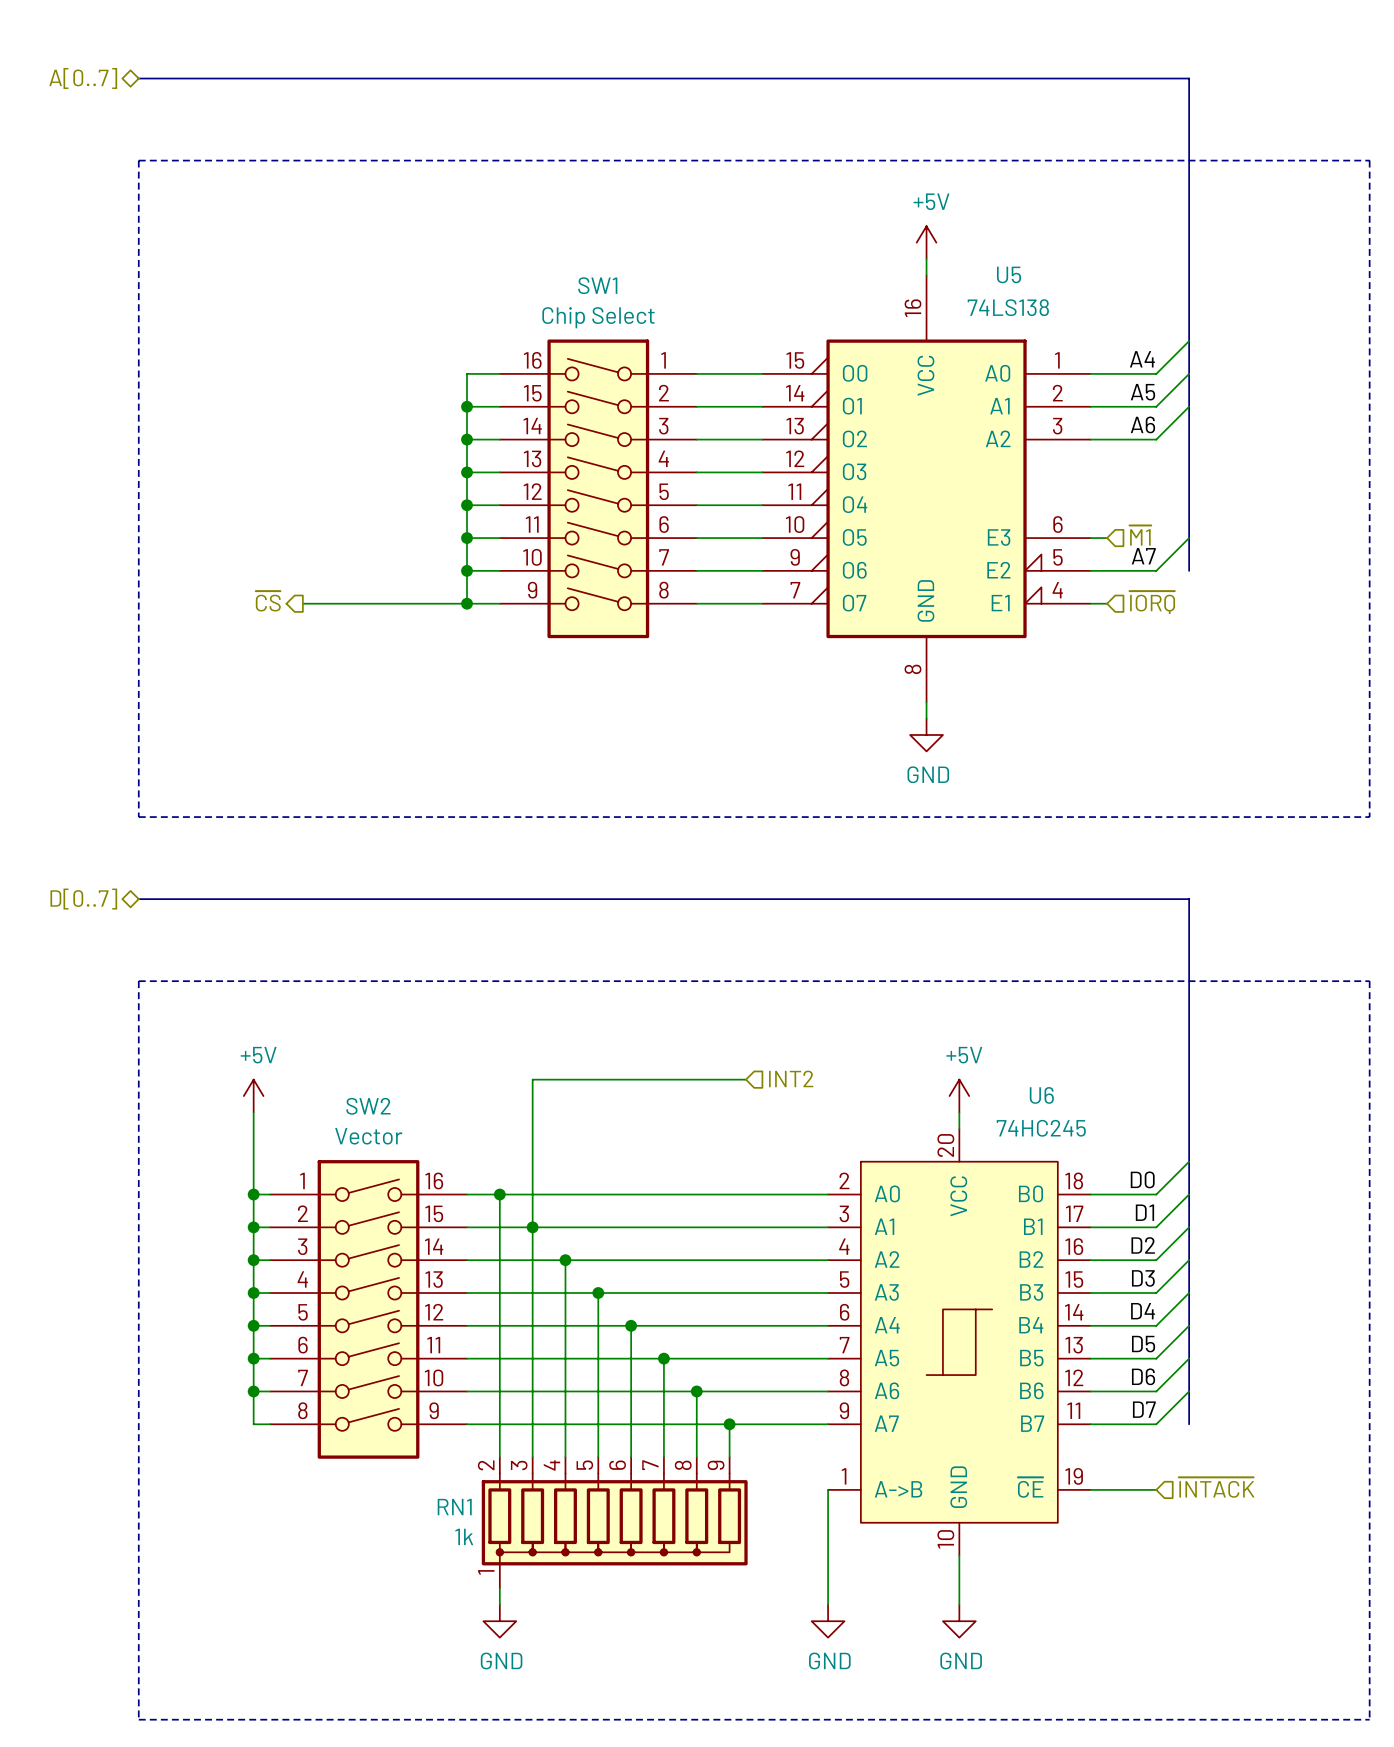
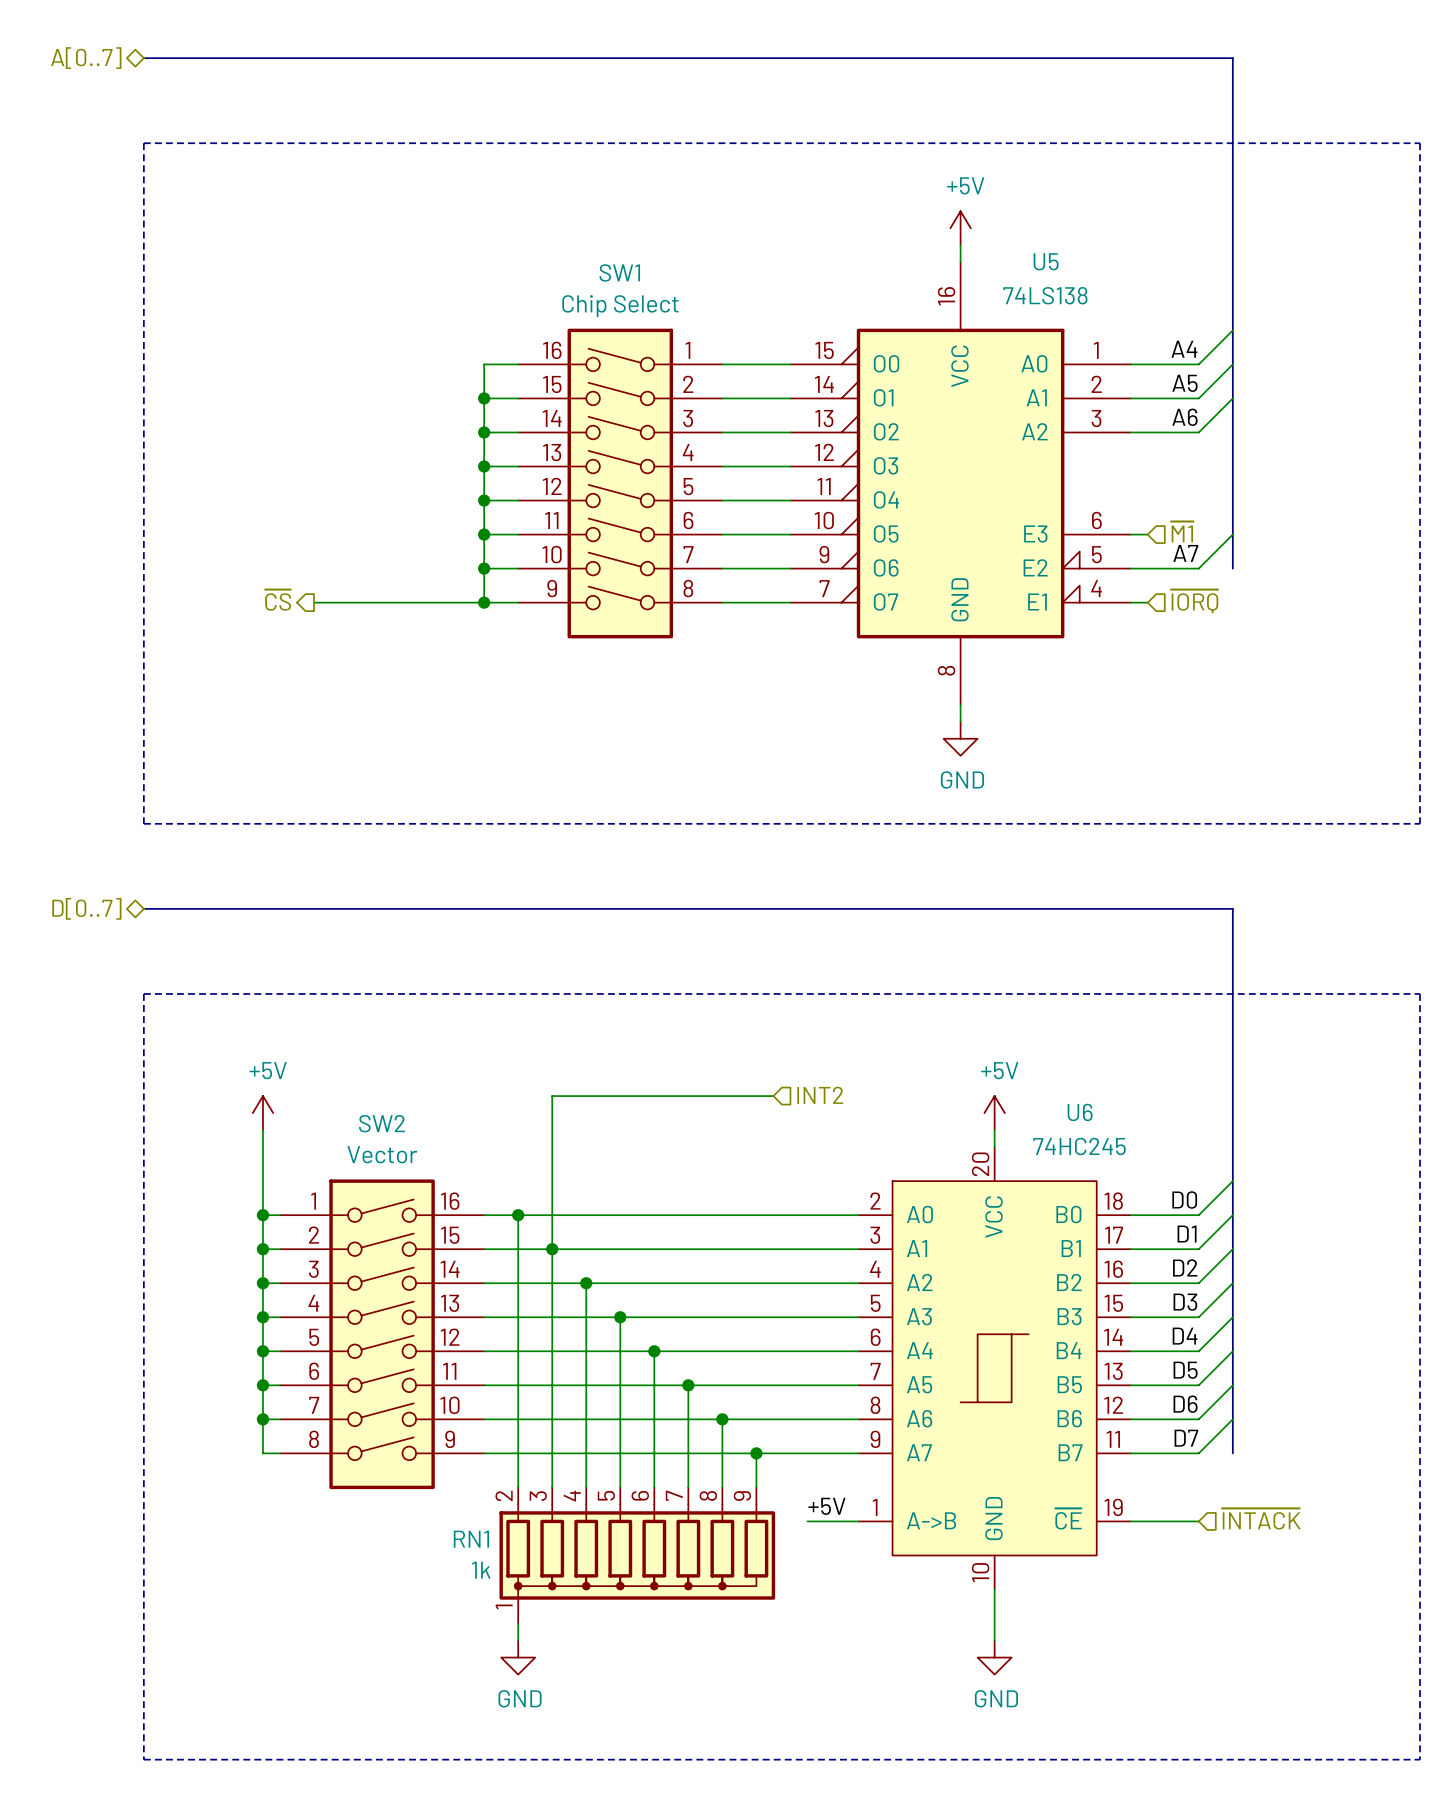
label: none -> +5V (827, 1506)
wire: (828, 1489) (828, 1604) -> (858, 1521) (807, 1521)
power symbol: GND (828, 1621) -> none

